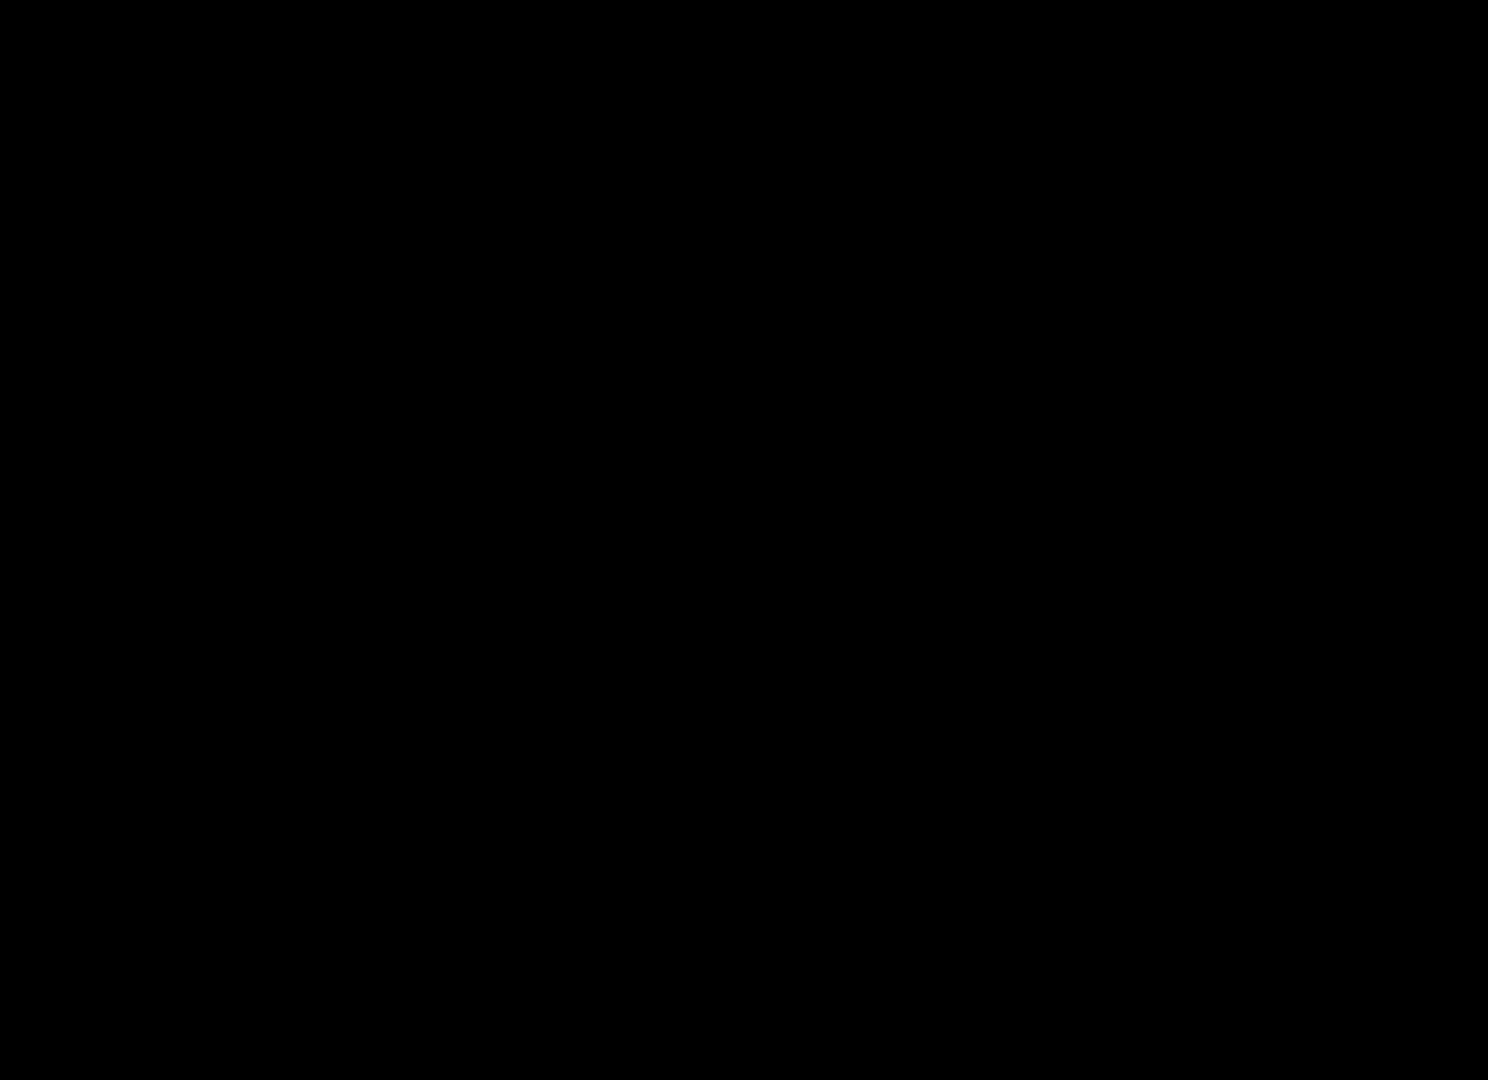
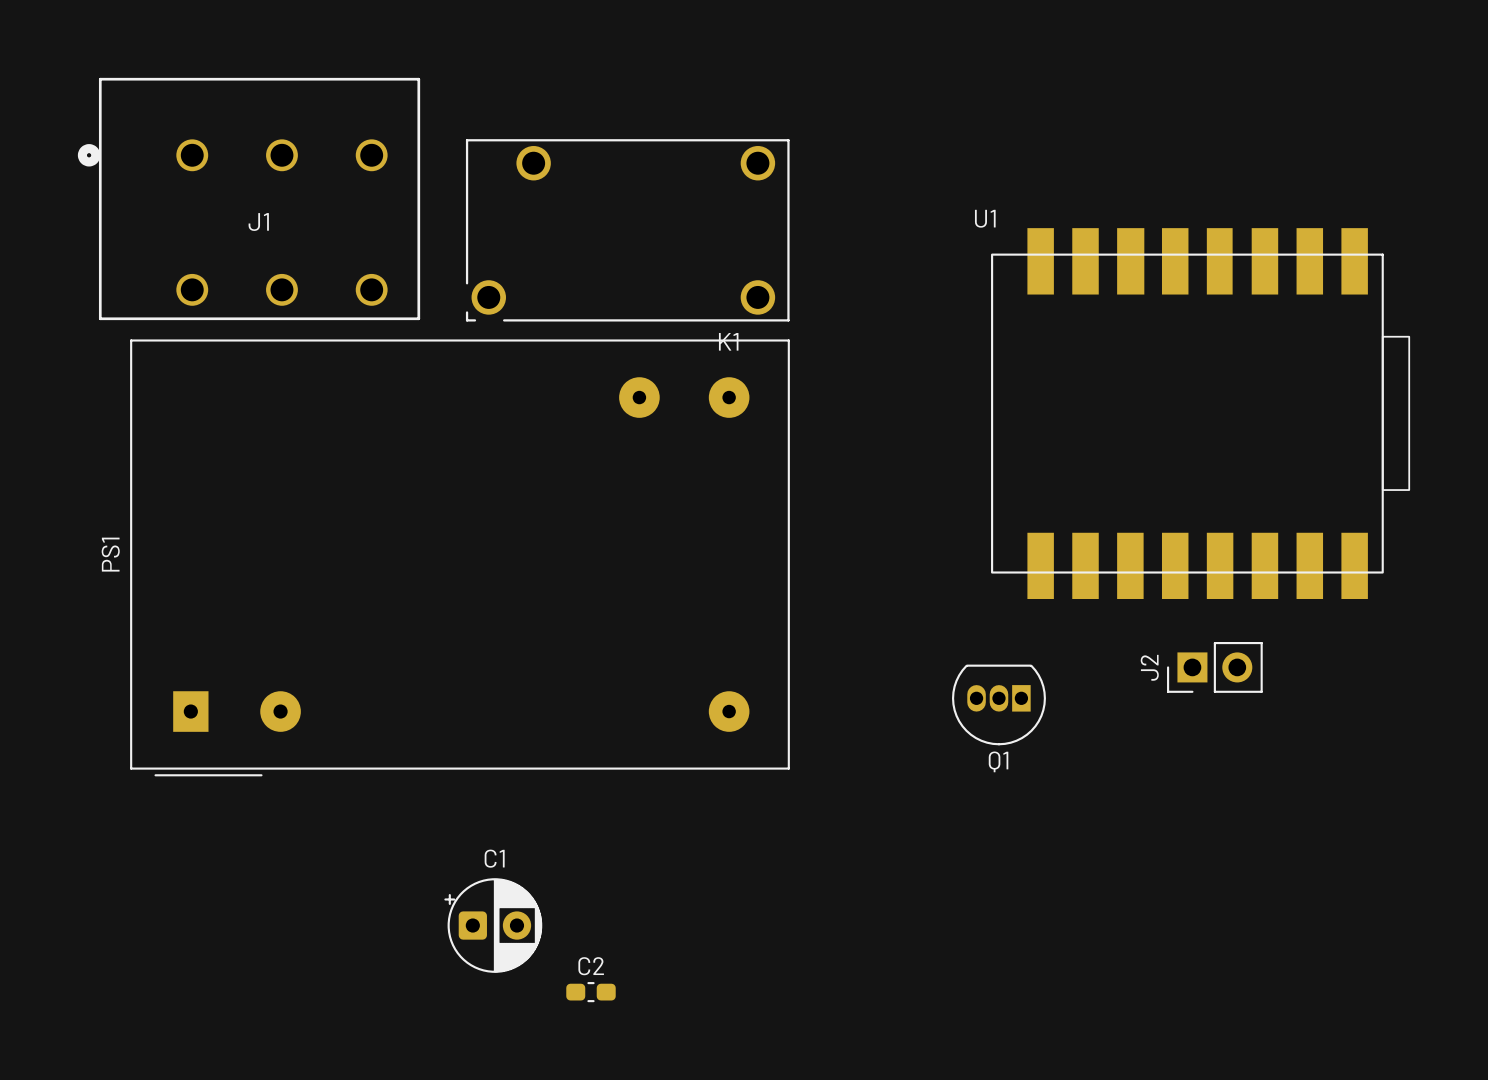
J1: none -> (249, 198)
K1: none -> (627, 230)
U1: none -> (1200, 413)
PS1: none -> (459, 557)
J2: none -> (1214, 667)
Q1: none -> (998, 704)
C1: none -> (493, 925)
C2: none -> (590, 992)

